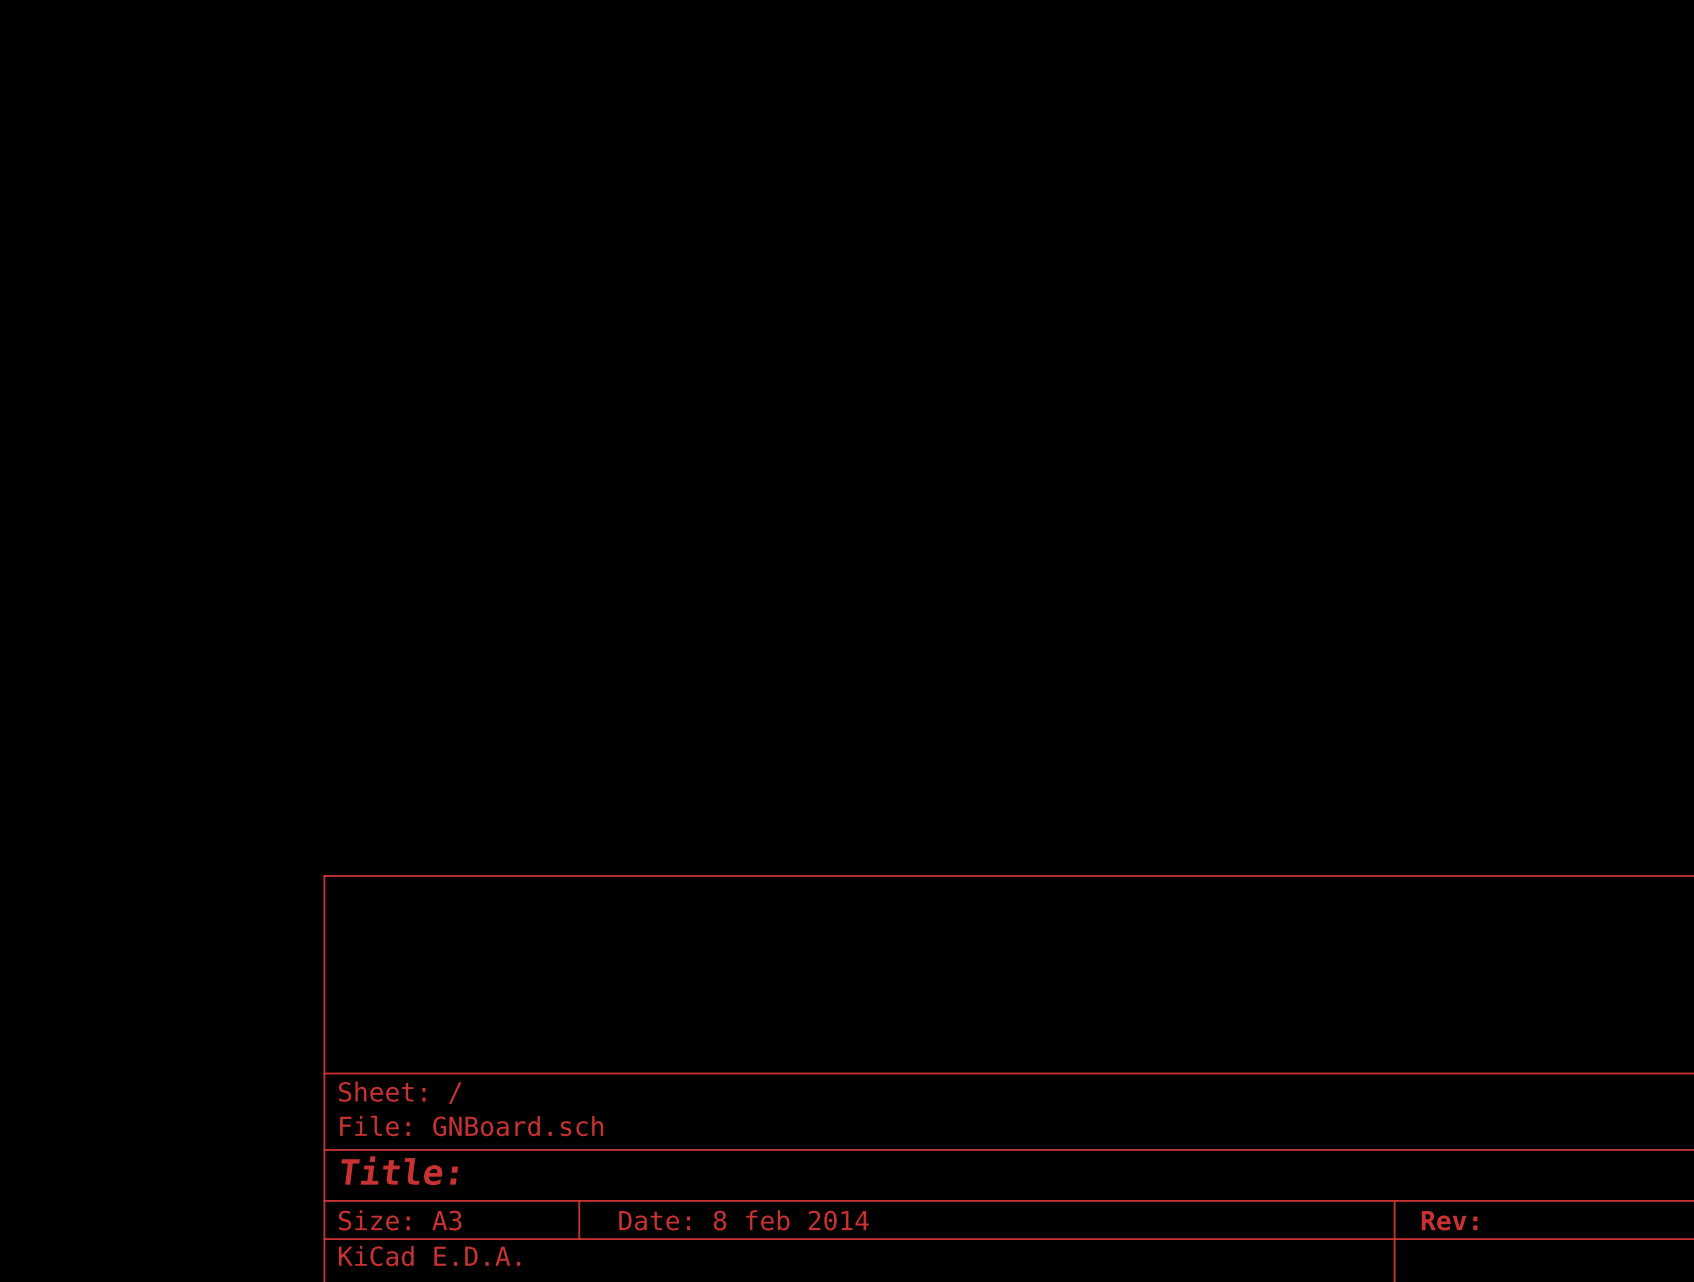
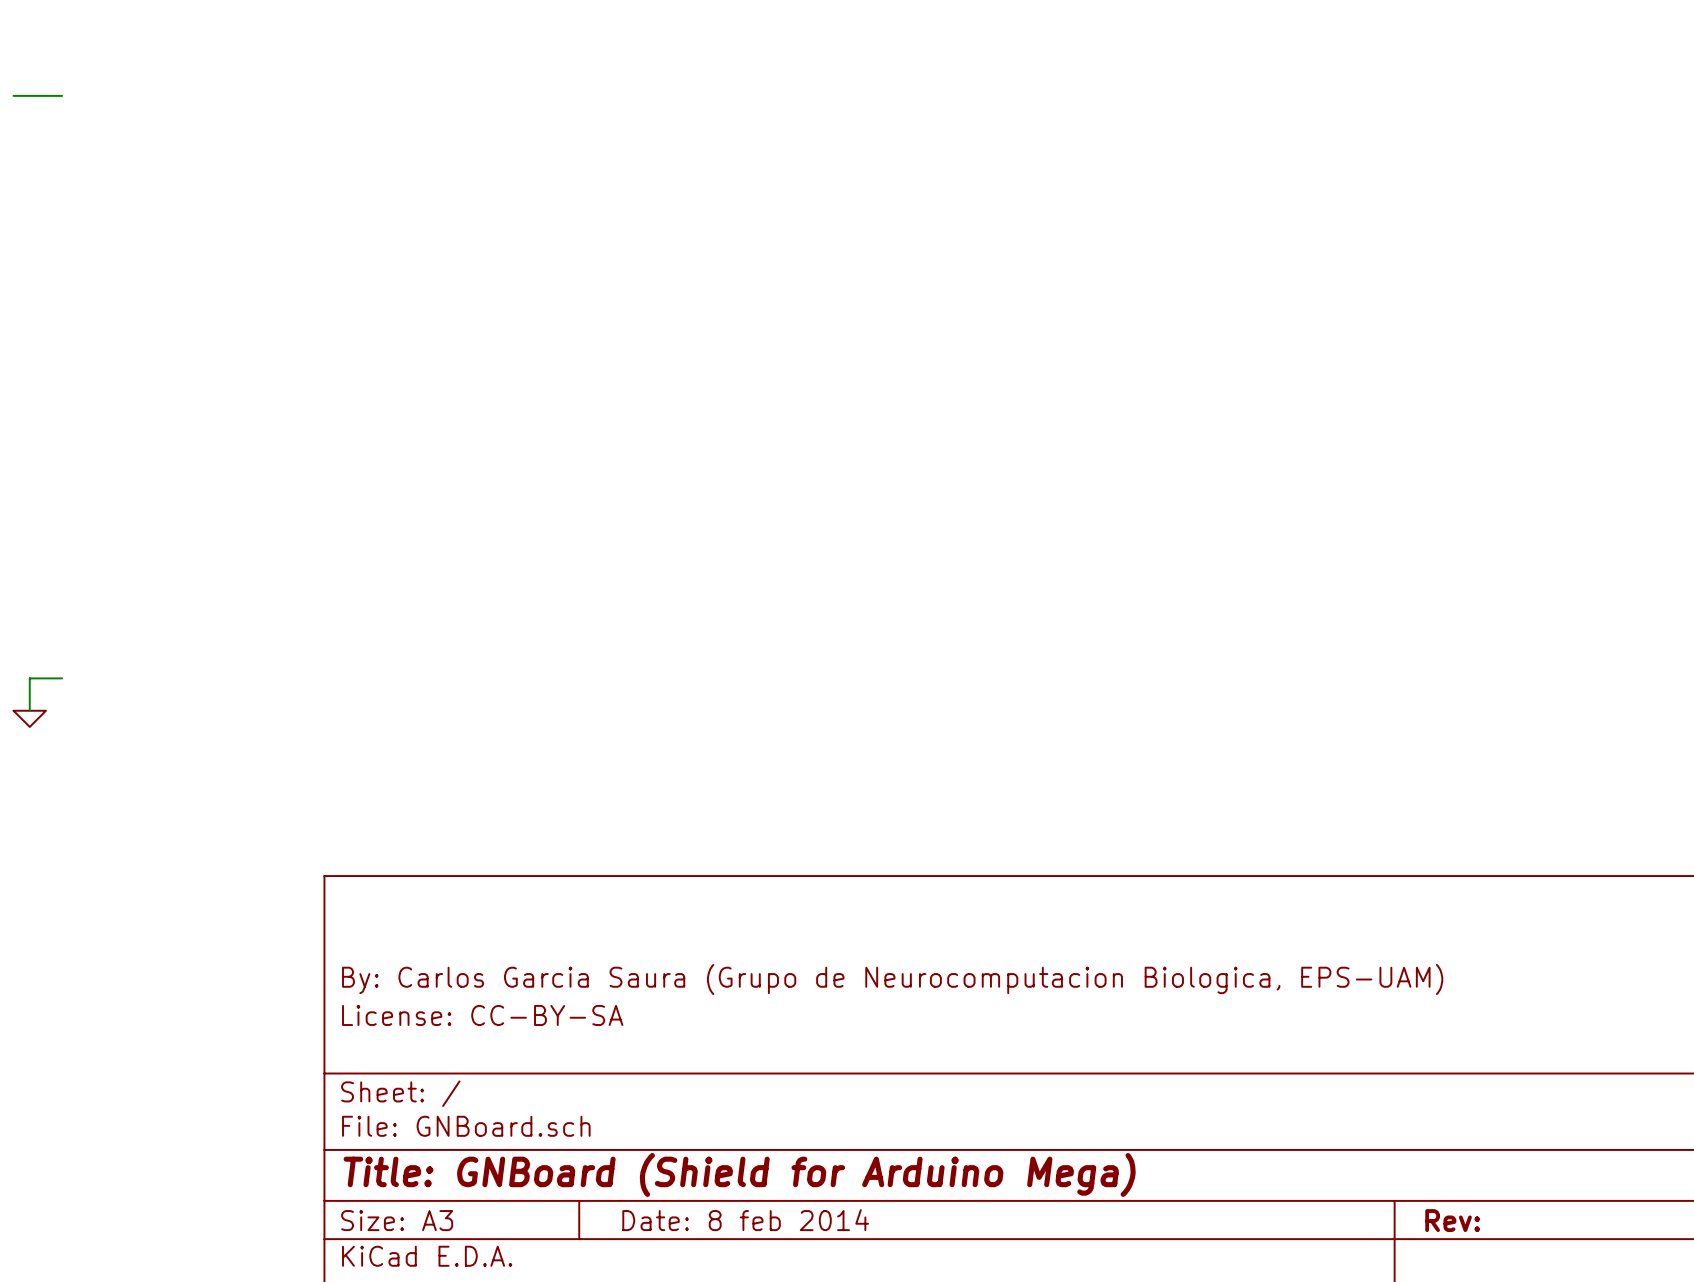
wire: none -> (13, 95) (62, 95)
wire: none -> (62, 678) (29, 678) (29, 710)
power symbol: none -> (29, 718)
title block: none -> By: Carlos Garcia Saura (Grupo de Neurocomputacion Biologica, EPS-UAM) (892, 979)
title block: none -> License: CC-BY-SA (482, 1015)
title block: Title: (399, 1170) -> Title: GNBoard (Shield for Arduino Mega) (739, 1174)

